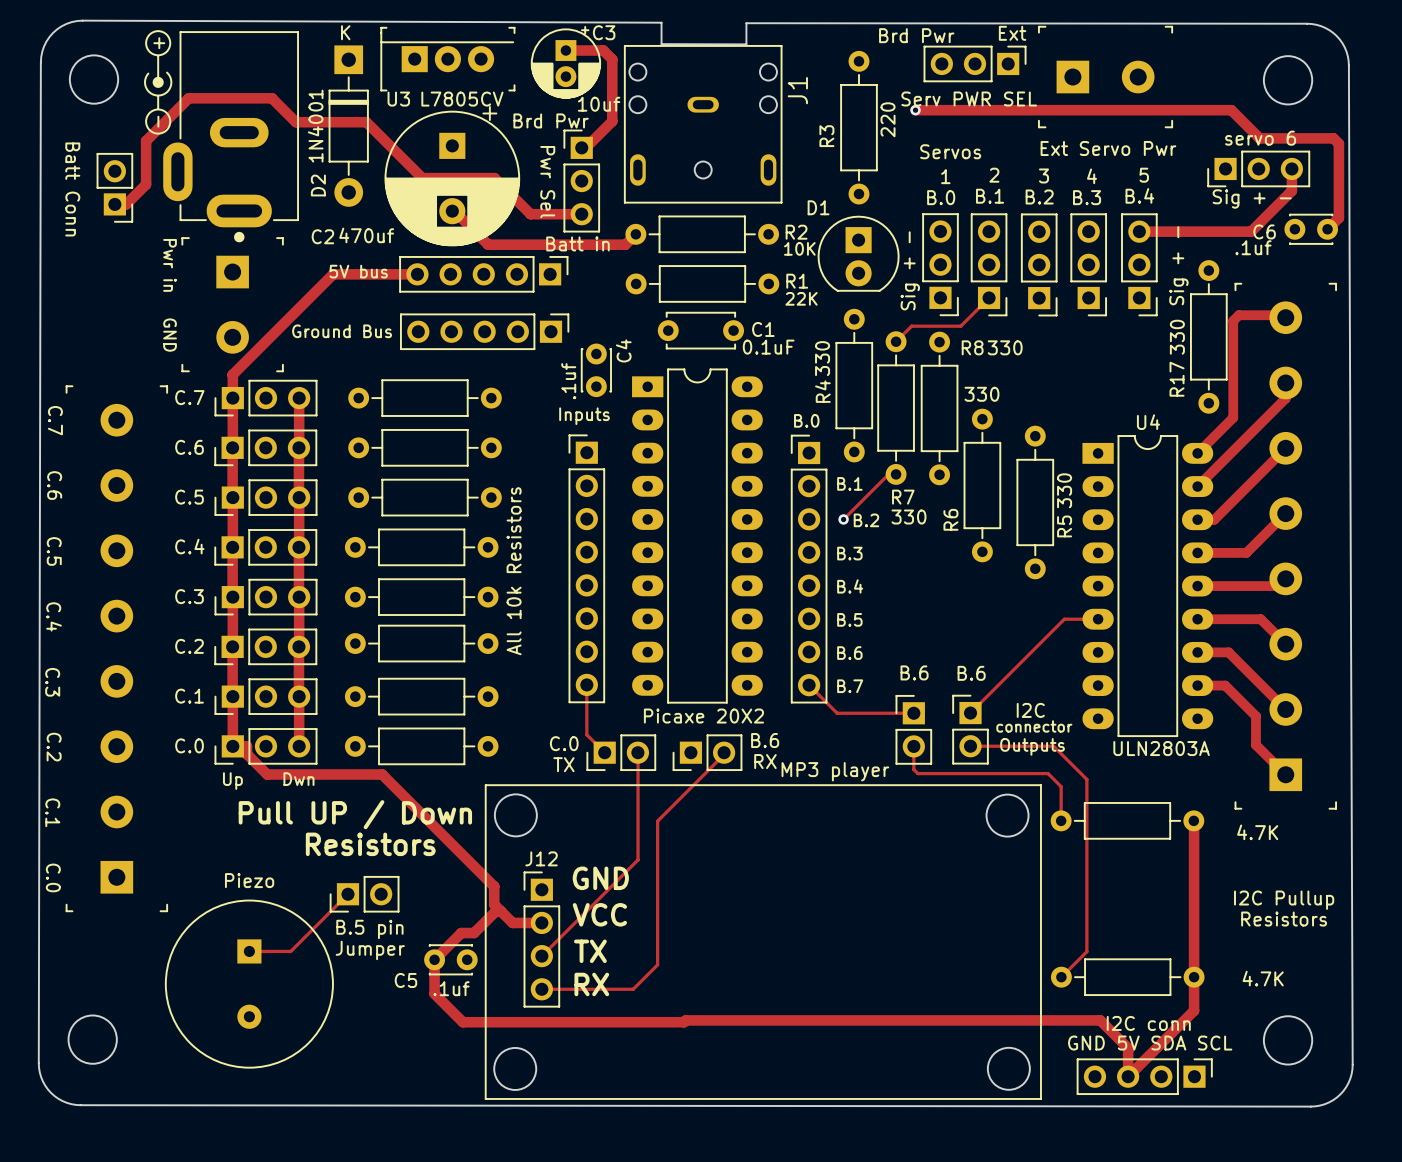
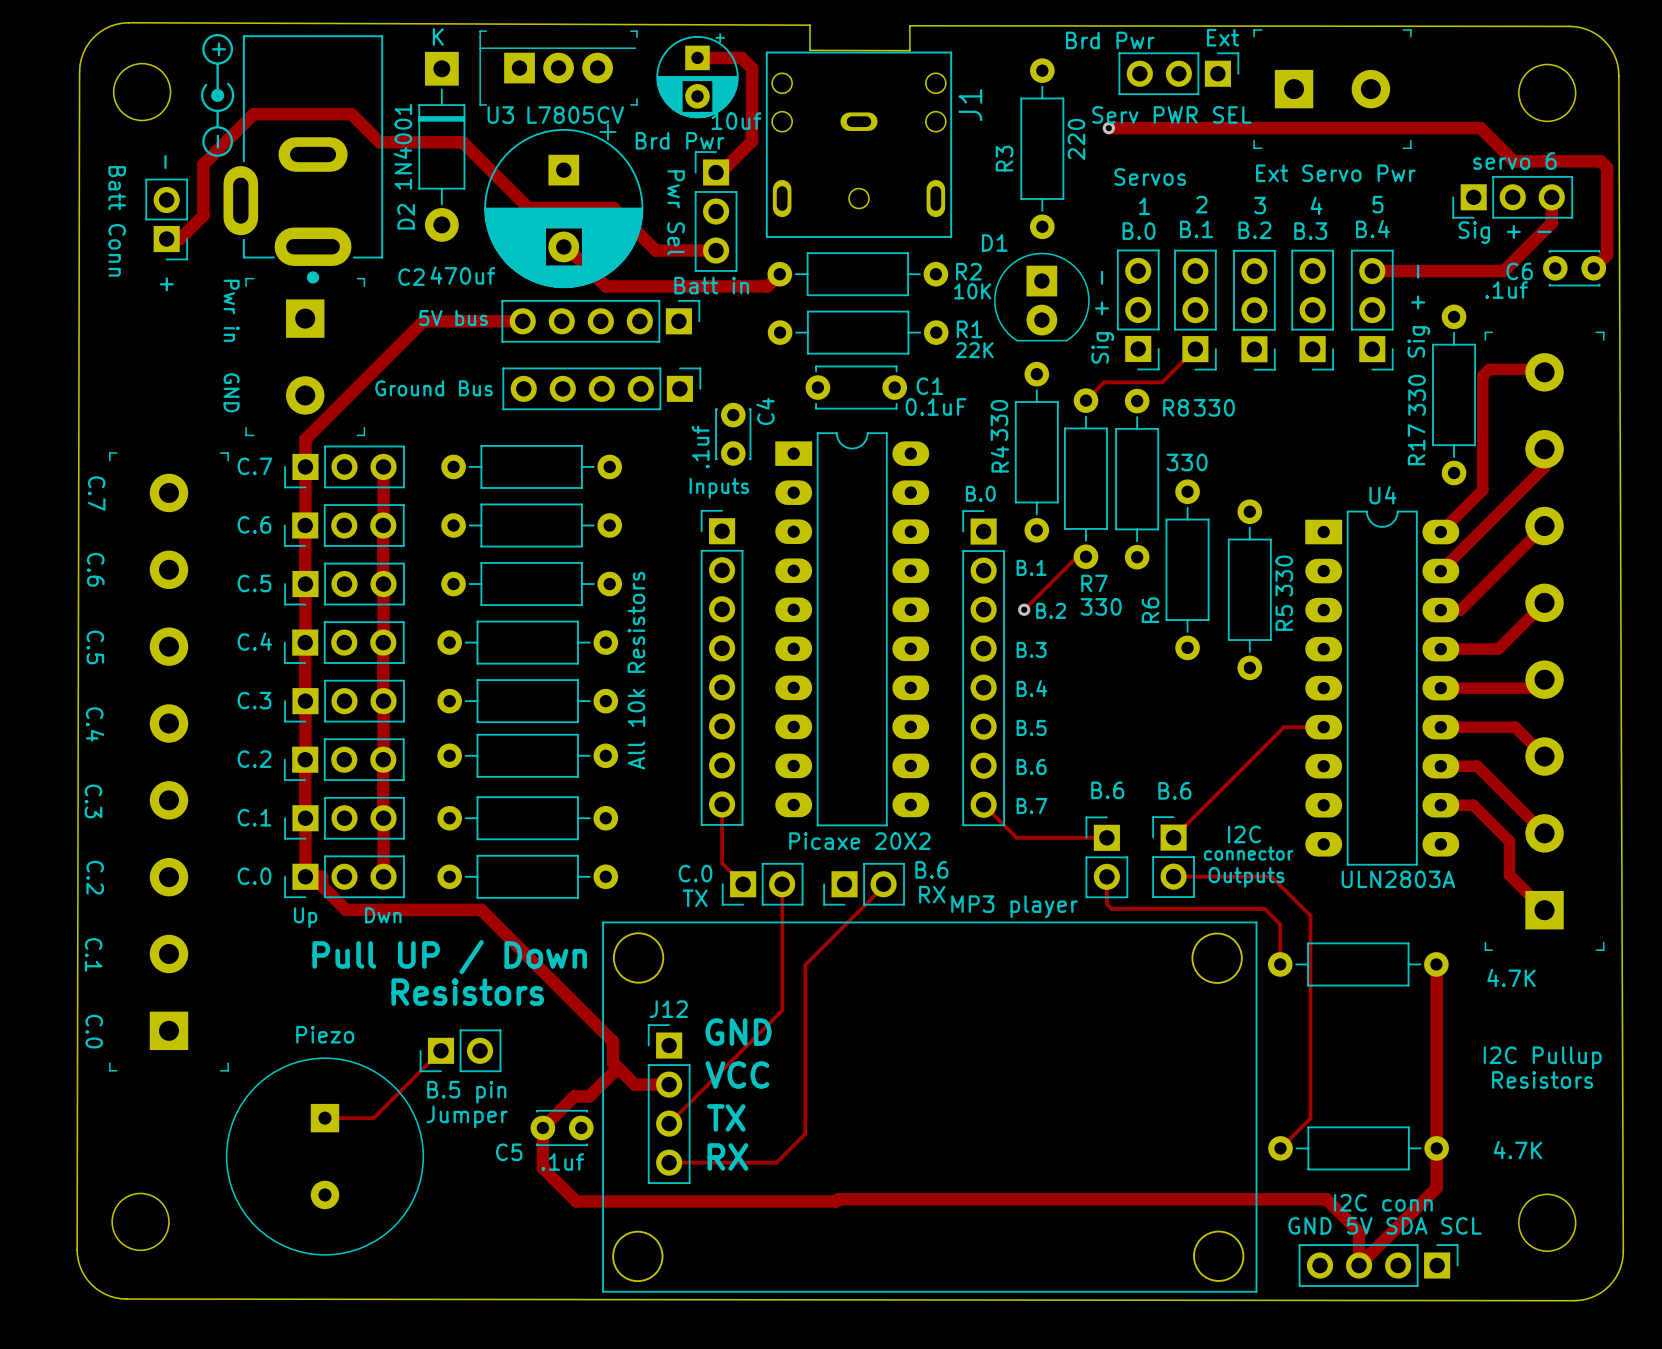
C3: (565, 62) -> none
part: none -> (697, 75)
text: none -> - (165, 161)
text: none -> + (166, 284)

